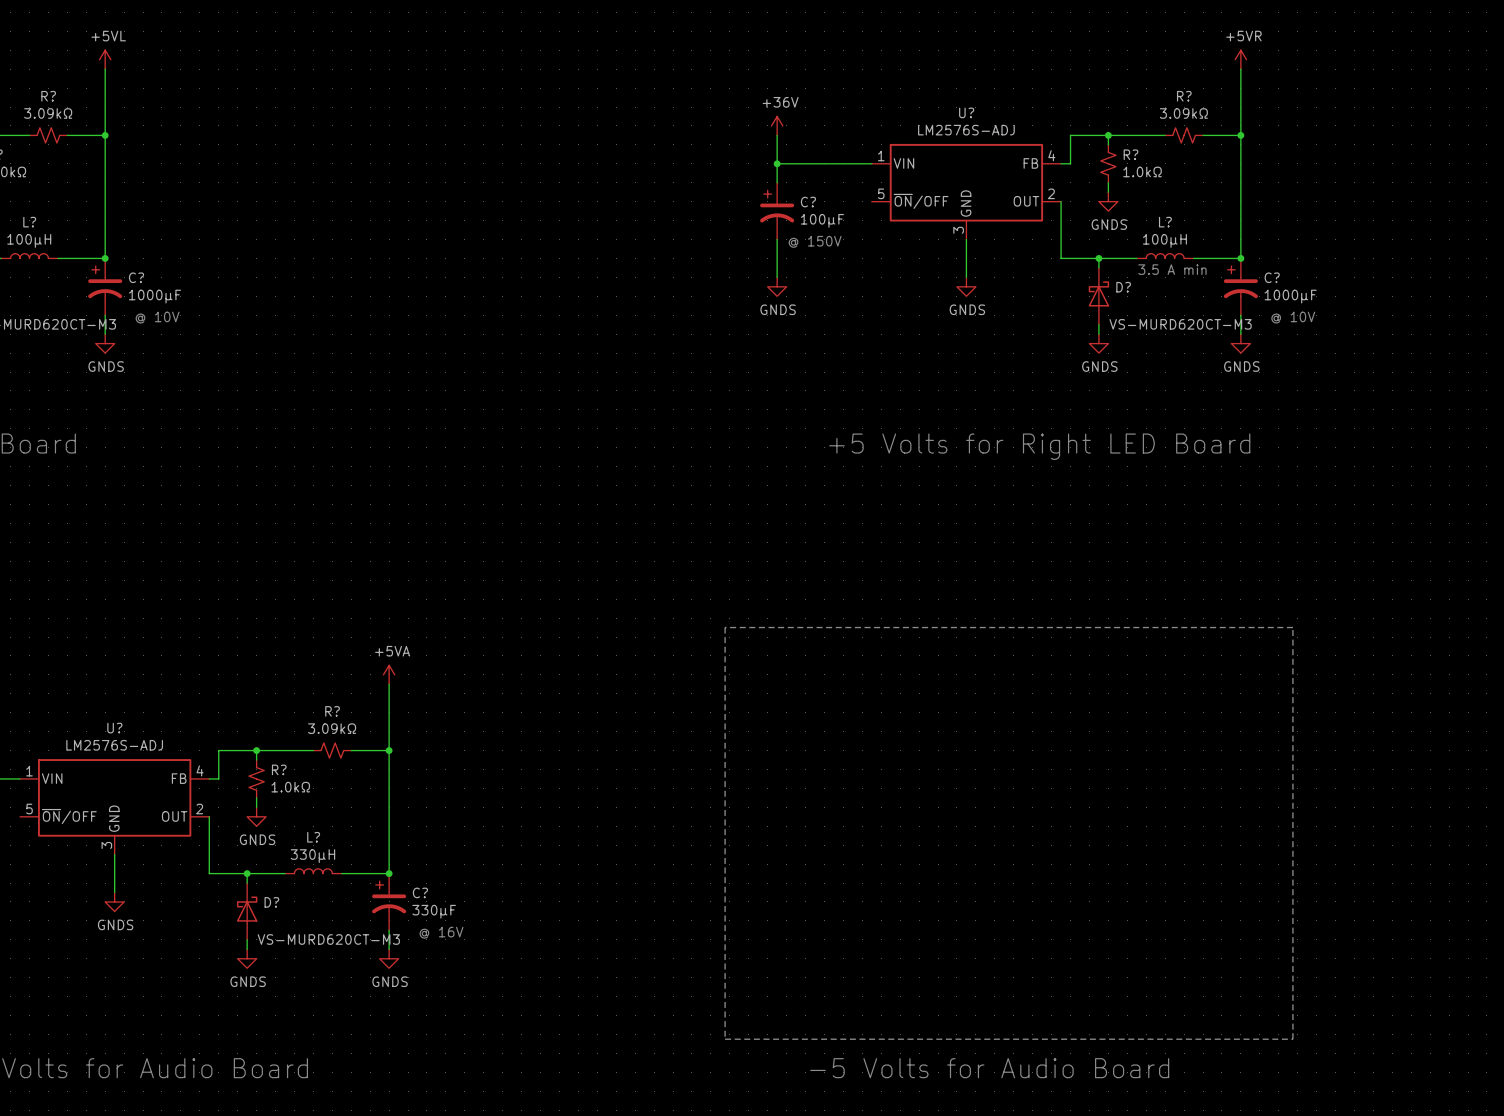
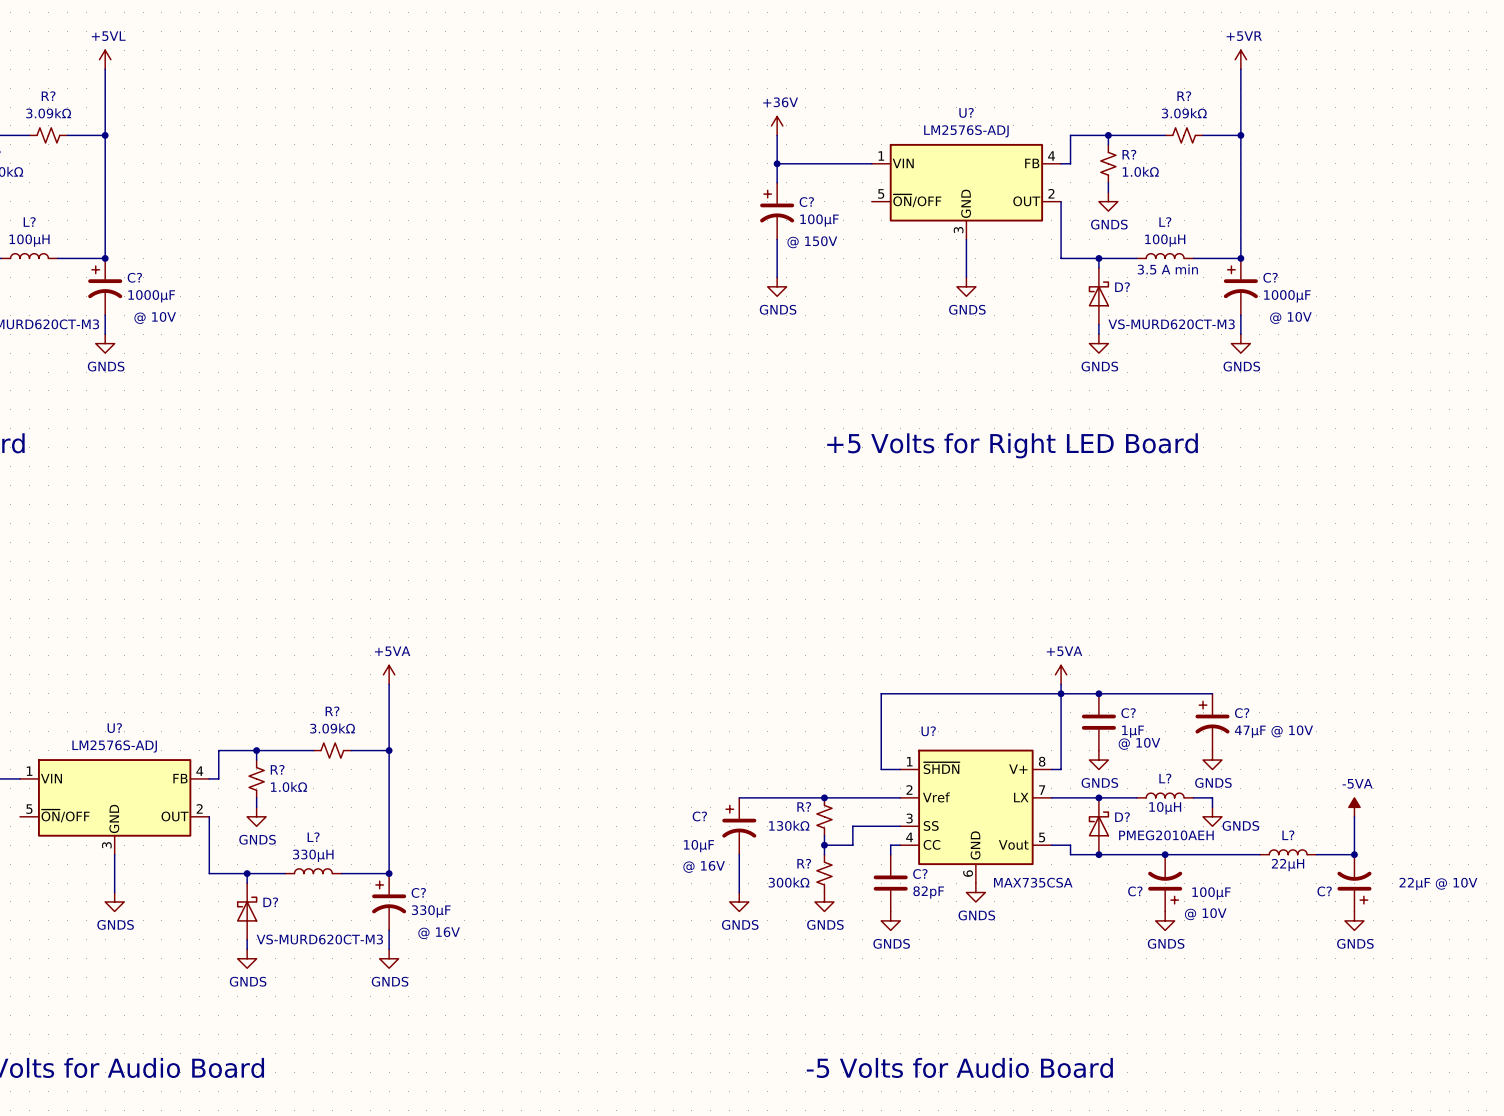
line: (725, 627) (1292, 627) (1292, 1039) (725, 1039) (725, 627) -> none
power symbol: none -> +5VA (1061, 674)
wire: none -> (1061, 684) (1061, 769) (1051, 769)
junction: none -> (1061, 693)
junction: none -> (1098, 693)
wire: none -> (1212, 693) (881, 693) (881, 769) (900, 769)
C?: none -> 1µF (1098, 722)
C?: none -> 47µF @ 10V (1212, 722)
text: none -> @ 10V (1139, 743)
power symbol: none -> GNDS (1098, 760)
power symbol: none -> GNDS (1212, 760)
L?: none -> 10µH (1165, 795)
wire: none -> (739, 797) (900, 797)
junction: none -> (824, 797)
wire: none -> (1051, 797) (1136, 797)
junction: none -> (1098, 797)
wire: none -> (1193, 797) (1212, 797) (1212, 807)
power symbol: none -> -5VA (1354, 807)
R?: none -> 130kΩ (824, 816)
U?: none -> MAX735CSA (975, 816)
power symbol: none -> GNDS (1212, 816)
wire: none -> (1354, 816) (1354, 854) (1316, 854)
C?: none -> 10µF (739, 826)
wire: none -> (900, 826) (852, 826) (852, 845) (824, 845)
D?: none -> PMEG2010AEH (1098, 826)
wire: none -> (824, 835) (824, 854)
junction: none -> (824, 845)
wire: none -> (900, 845) (890, 845) (890, 854)
wire: none -> (1051, 845) (1070, 845) (1070, 854) (1259, 854)
L?: none -> 22µH (1288, 852)
wire: none -> (739, 854) (739, 892)
junction: none -> (1098, 854)
junction: none -> (1165, 854)
junction: none -> (1354, 854)
text: none -> @ 16V (704, 866)
R?: none -> 300kΩ (824, 873)
C?: none -> 82pF (890, 883)
C?: none -> 100µF (1165, 883)
C?: none -> 22µF @ 10V (1354, 883)
power symbol: none -> GNDS (975, 892)
power symbol: none -> GNDS (739, 901)
power symbol: none -> GNDS (824, 901)
text: none -> @ 10V (1205, 914)
power symbol: none -> GNDS (890, 920)
power symbol: none -> GNDS (1165, 920)
power symbol: none -> GNDS (1354, 920)

